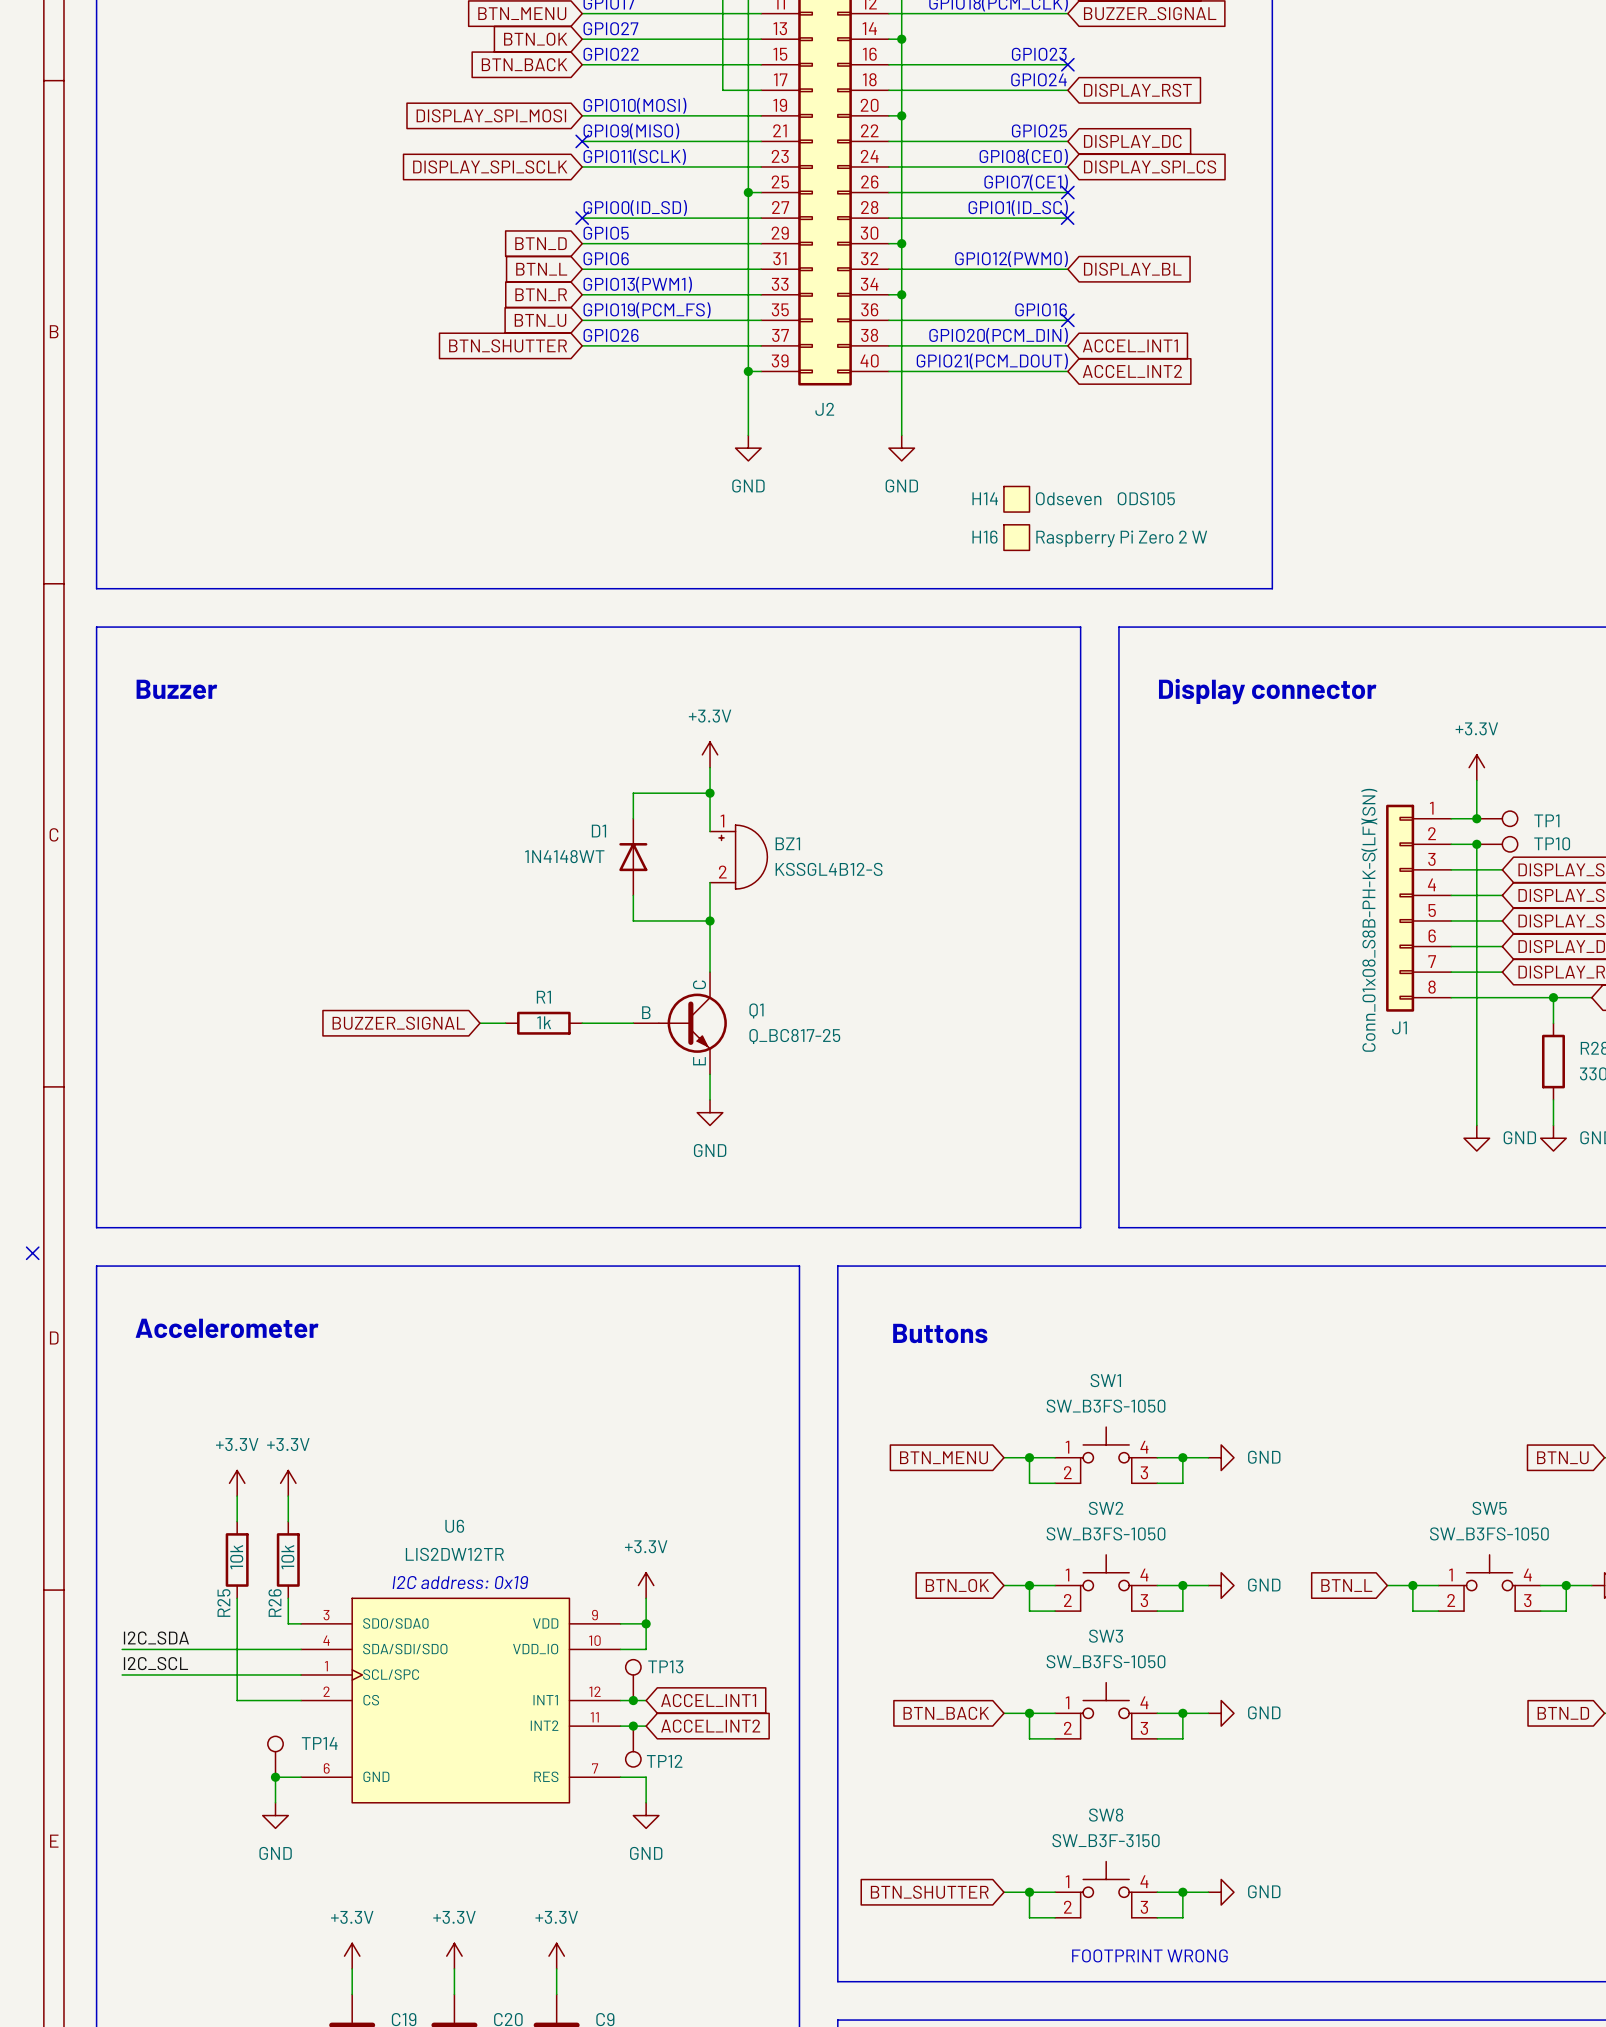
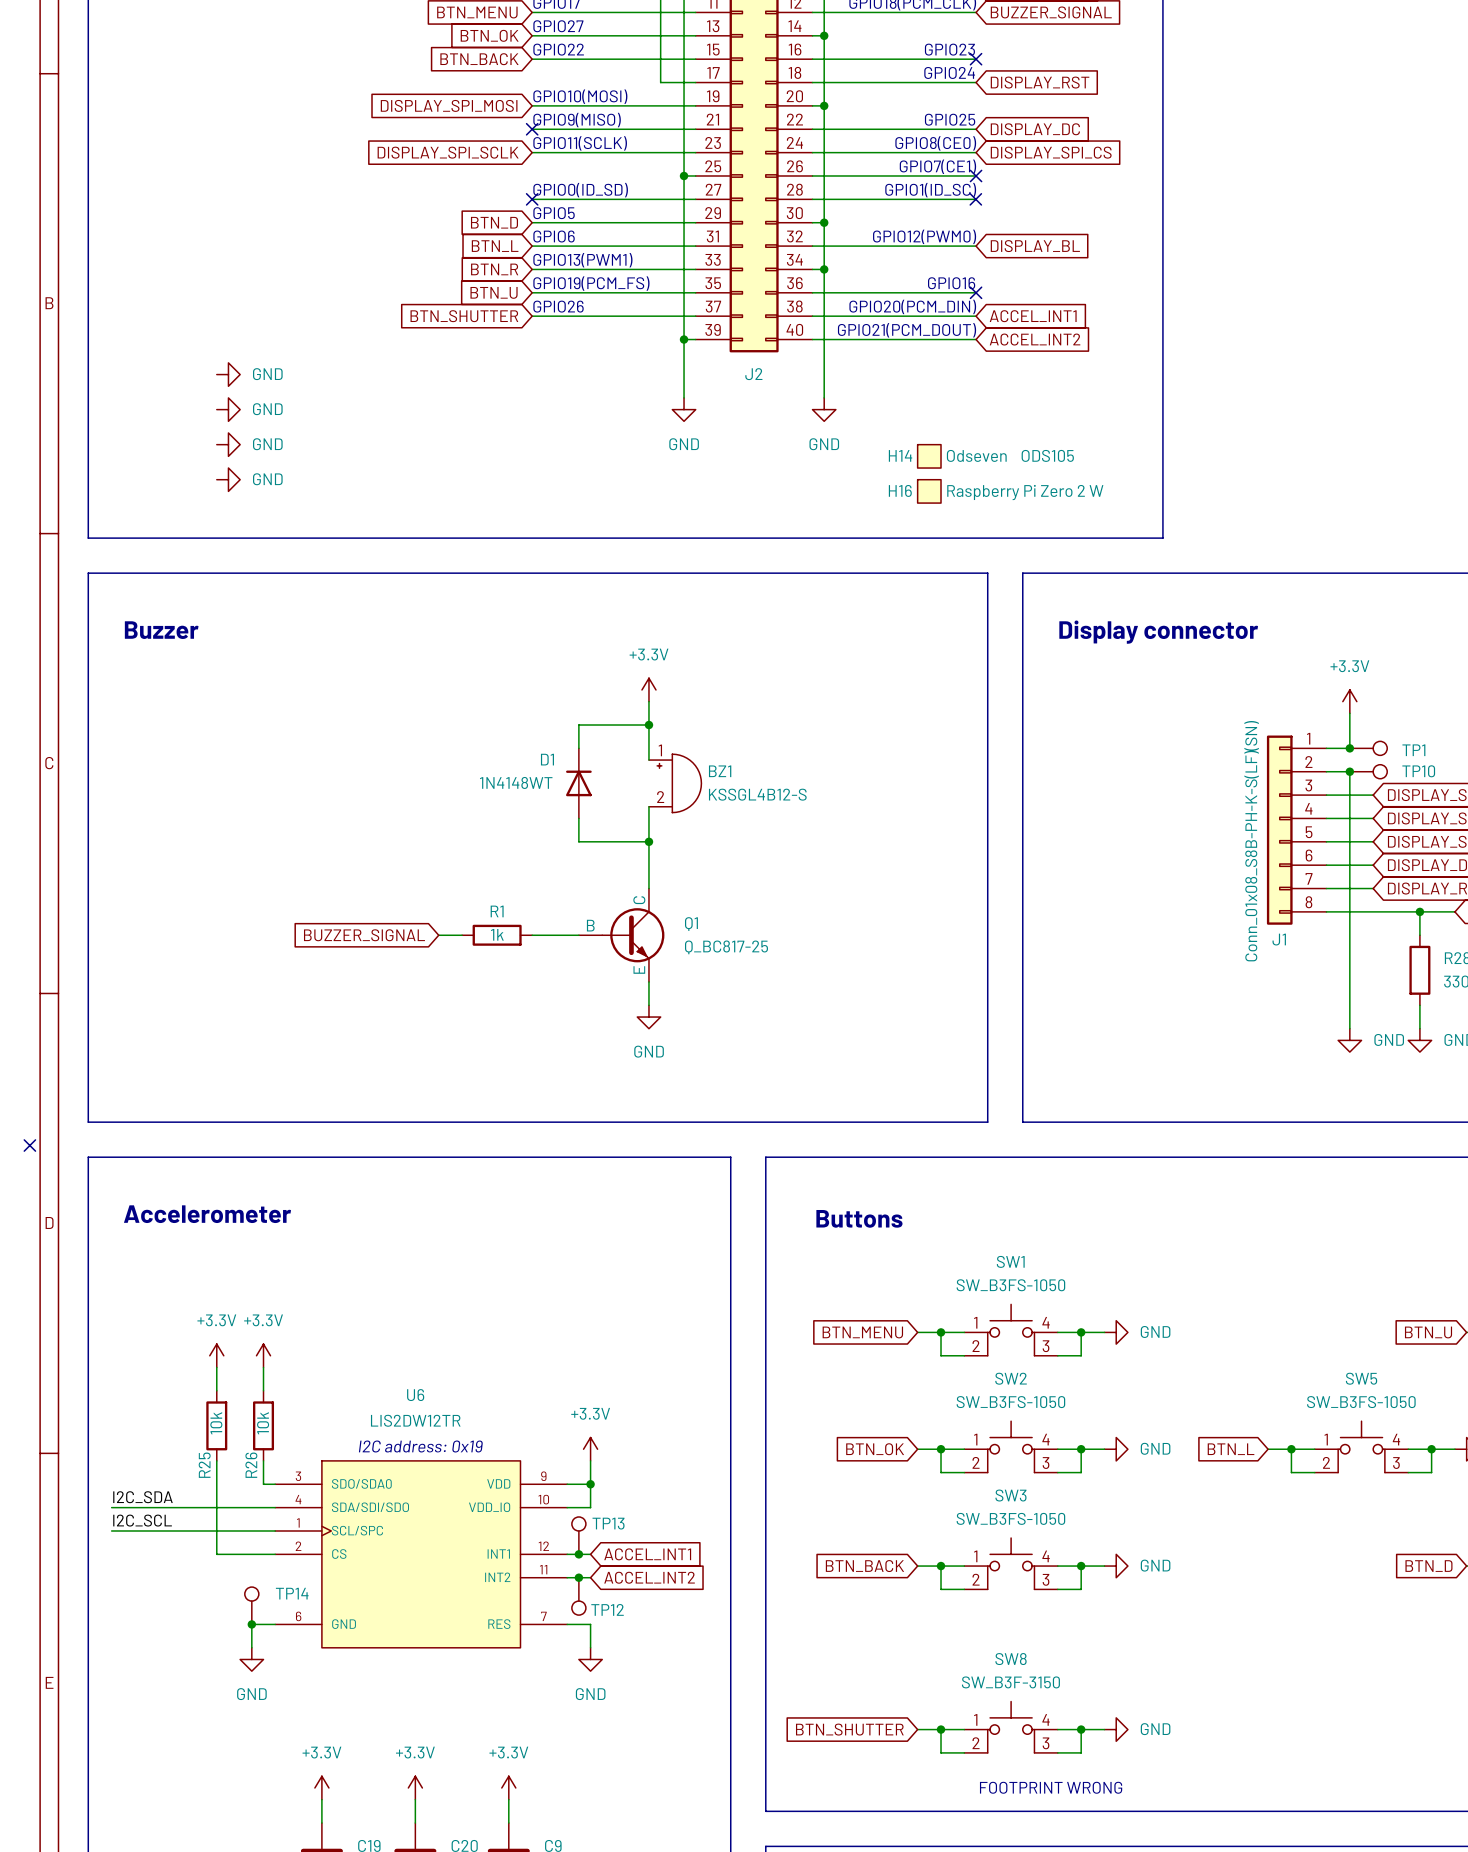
power symbol: none -> GND (228, 374)
power symbol: none -> GND (228, 409)
power symbol: none -> GND (228, 444)
power symbol: none -> GND (228, 479)

